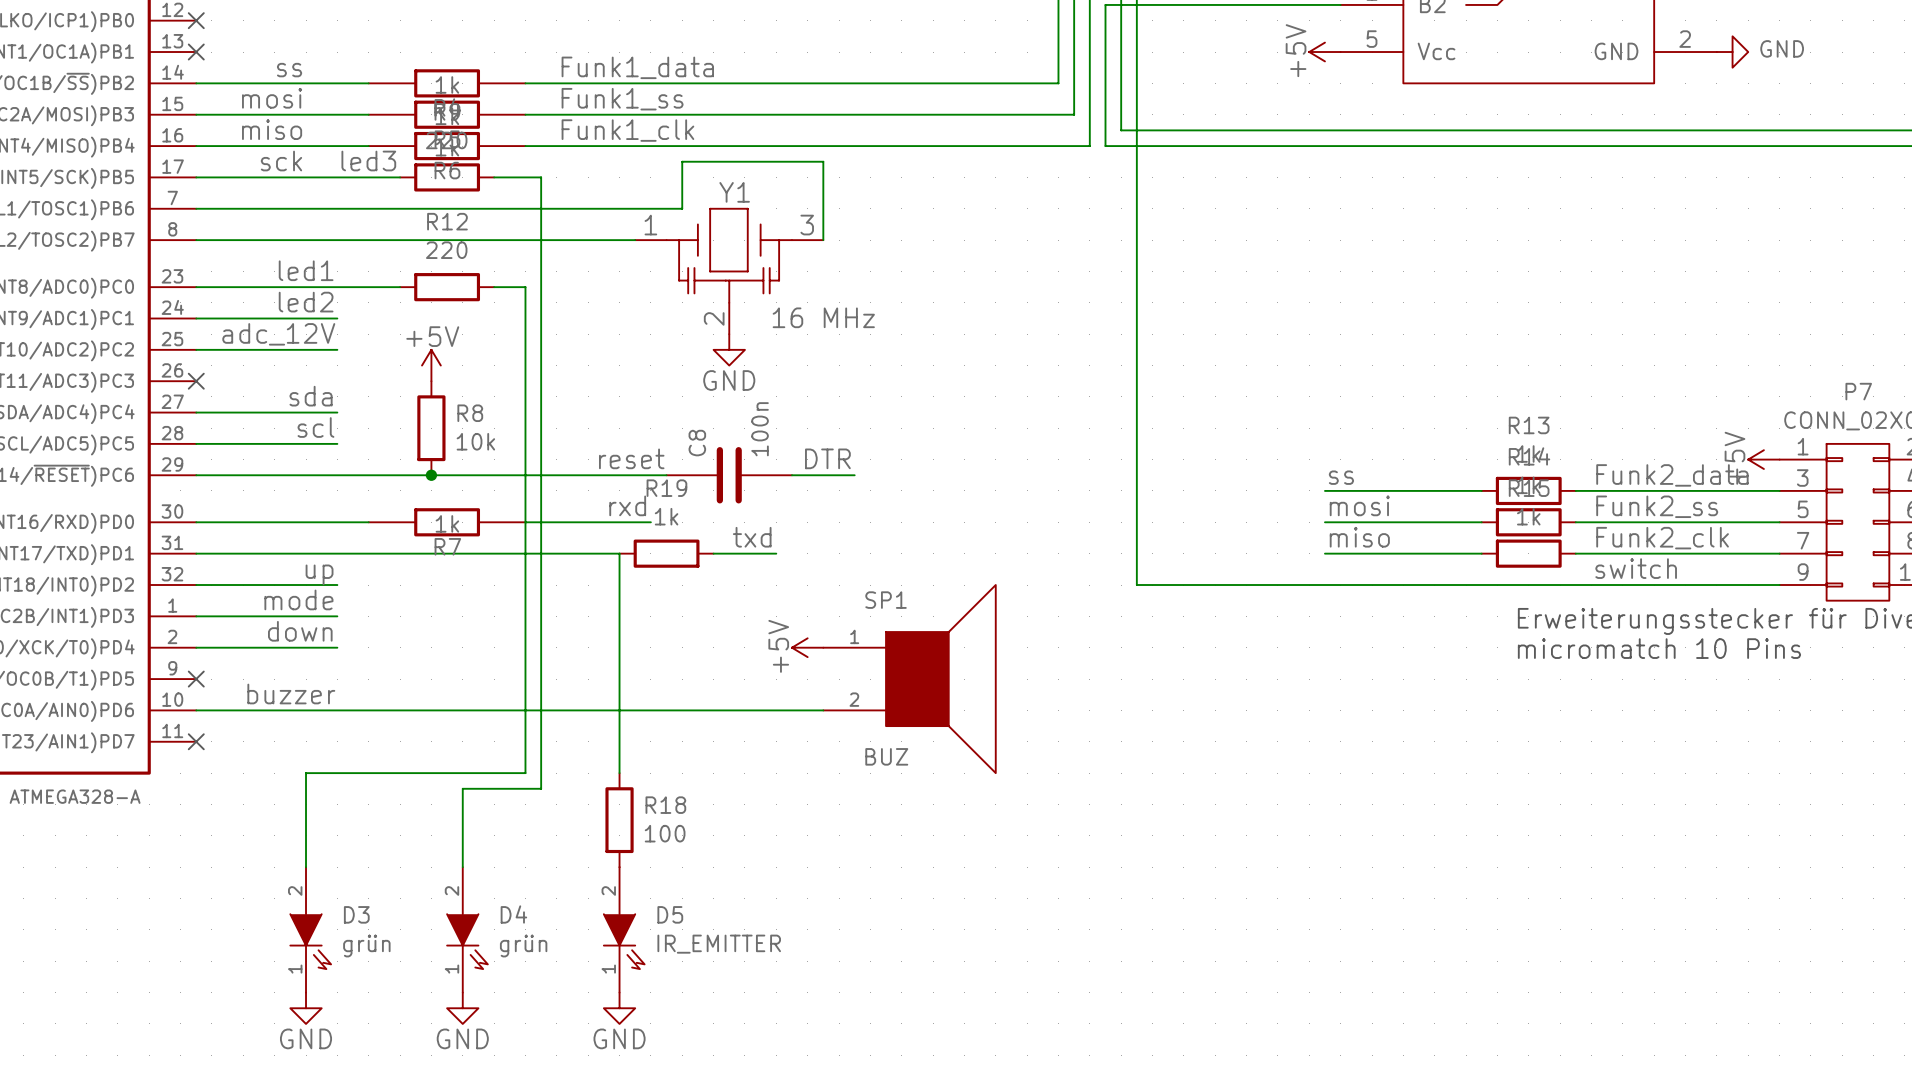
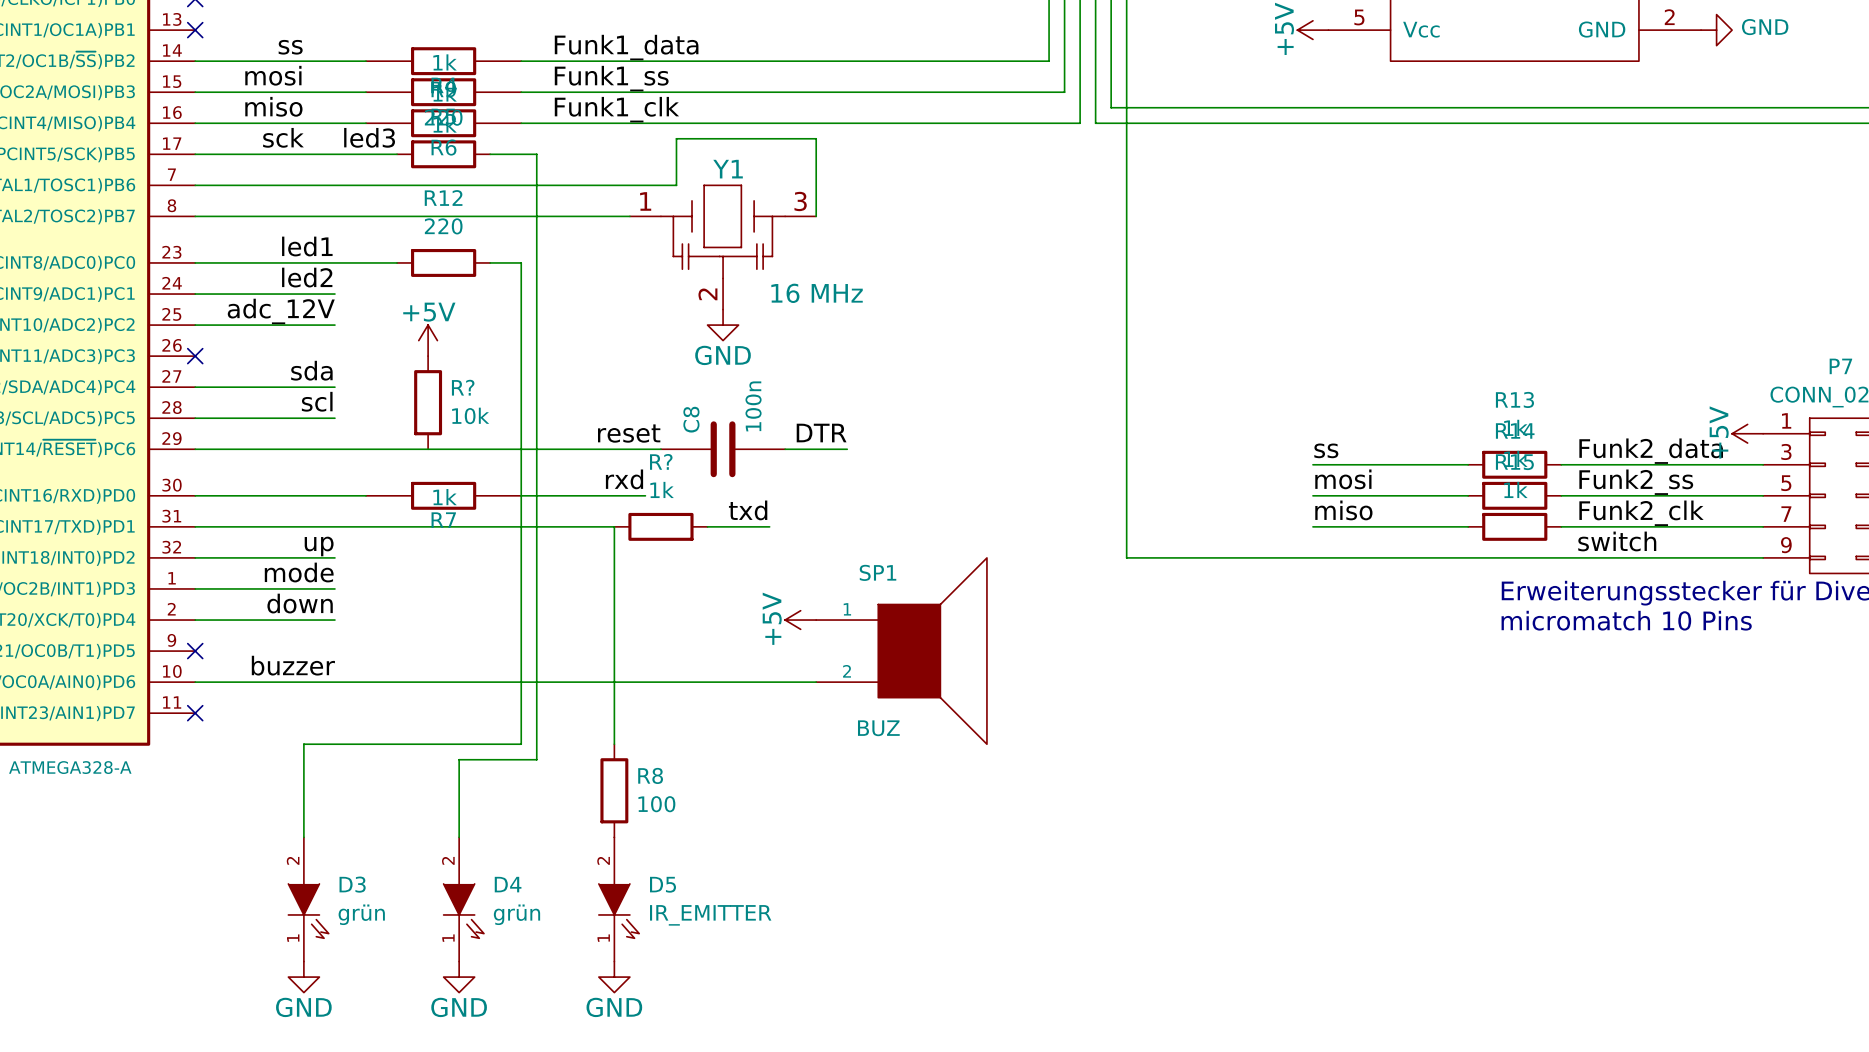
R8 name: R8 (470, 413) -> R? (463, 387)
junction: (431, 475) -> none
R19 name: R19 (666, 488) -> R? (661, 461)
R18 name: R18 (665, 805) -> R8 (650, 775)

